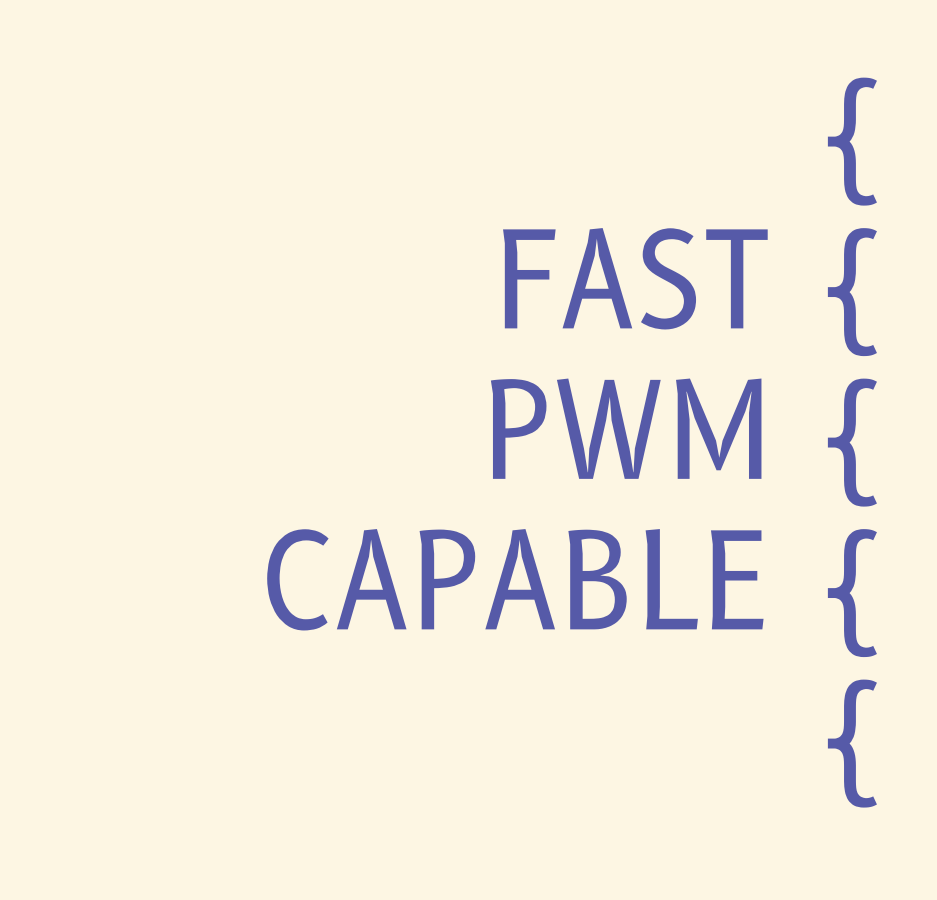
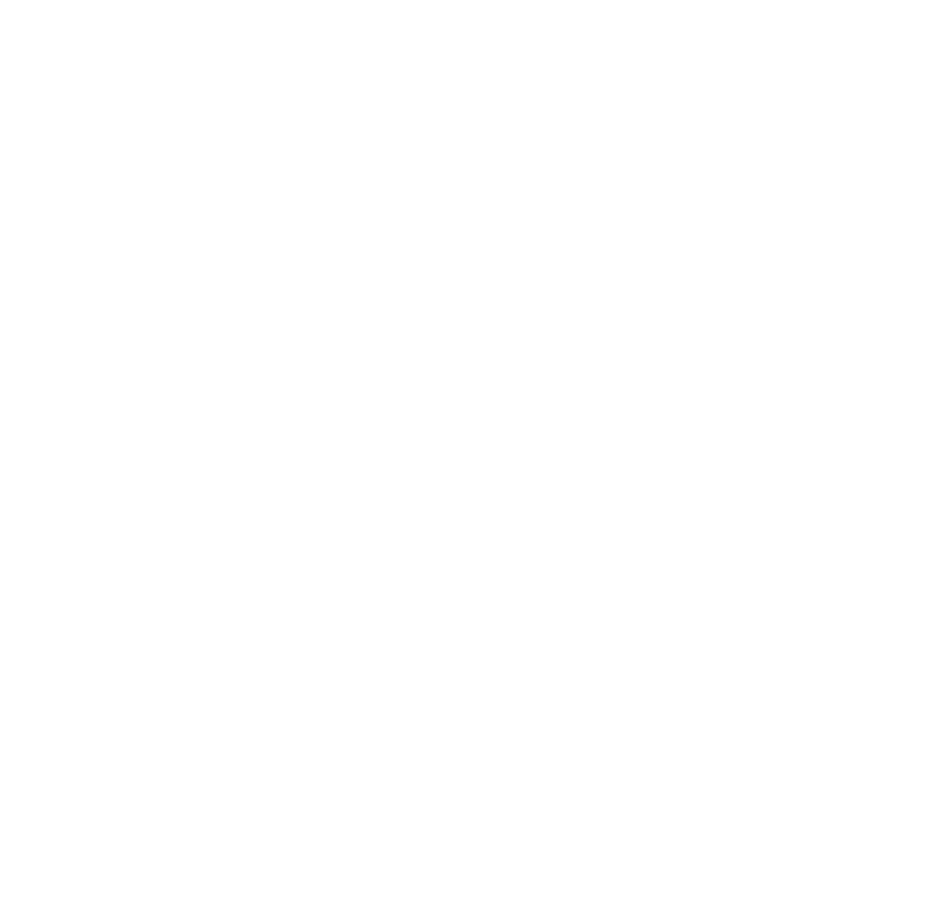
text: { (852, 141) -> none
text: FAST { (690, 292) -> none
text: PWM { (683, 442) -> none
text: CAPABLE { (572, 593) -> none
text: { (852, 743) -> none

